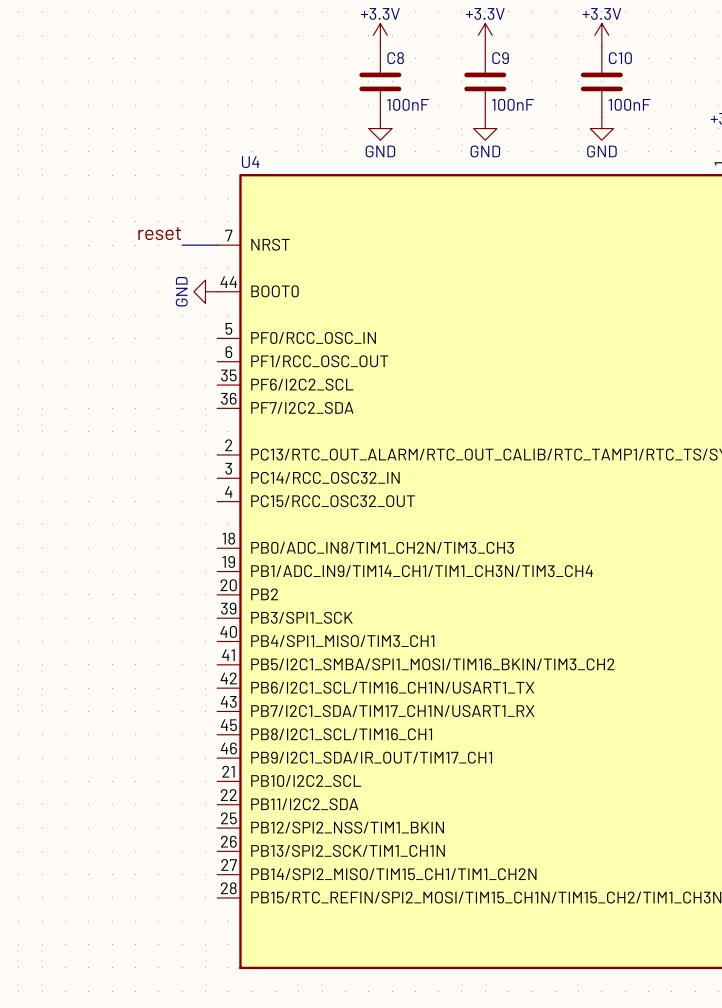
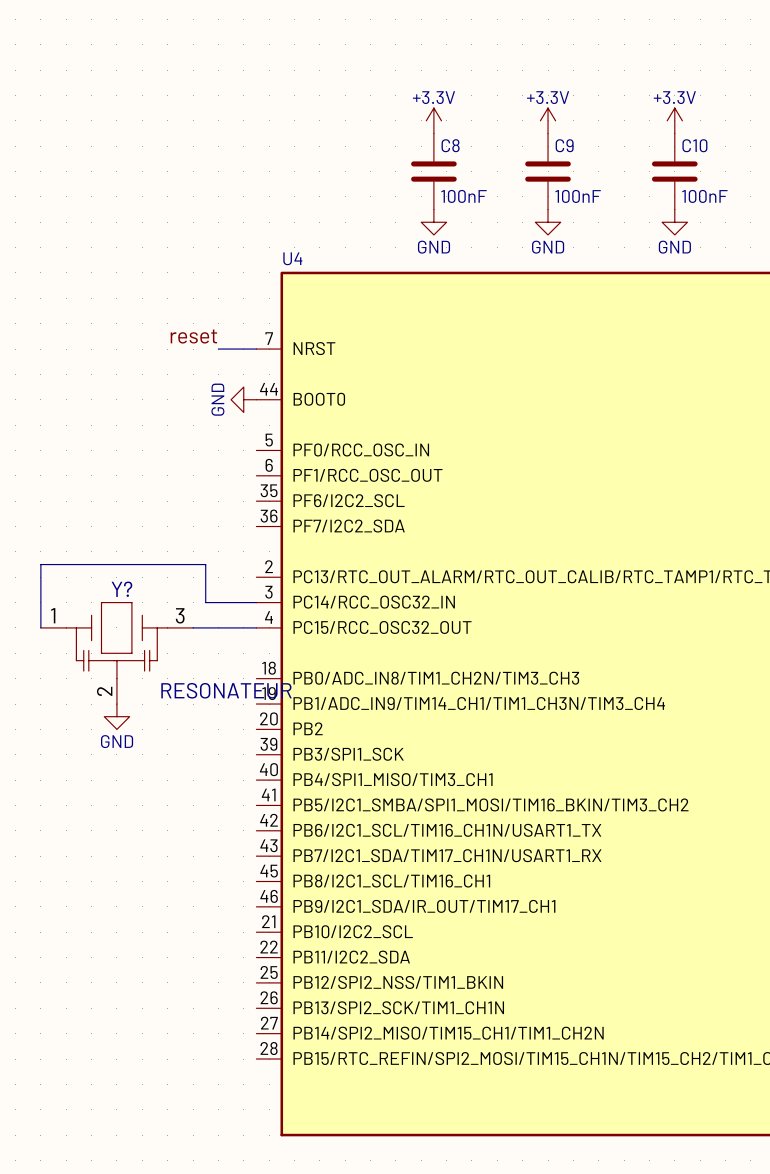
wire: none -> (256, 602) (205, 602) (205, 564) (40, 564) (40, 627)
wire: none -> (193, 627) (256, 627)
Y?: none -> RESONATEUR (116, 653)
power symbol: none -> GND (116, 716)

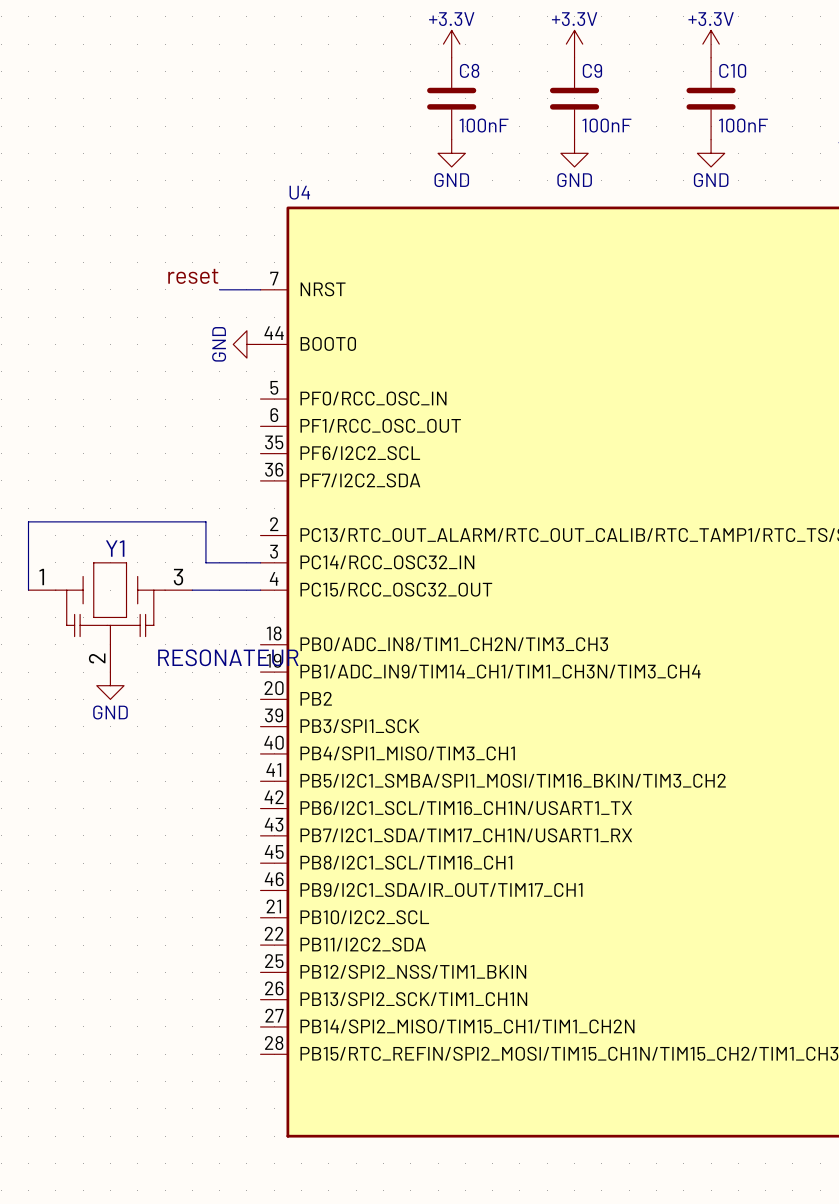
Y? name: Y? (121, 589) -> Y1 (115, 548)

